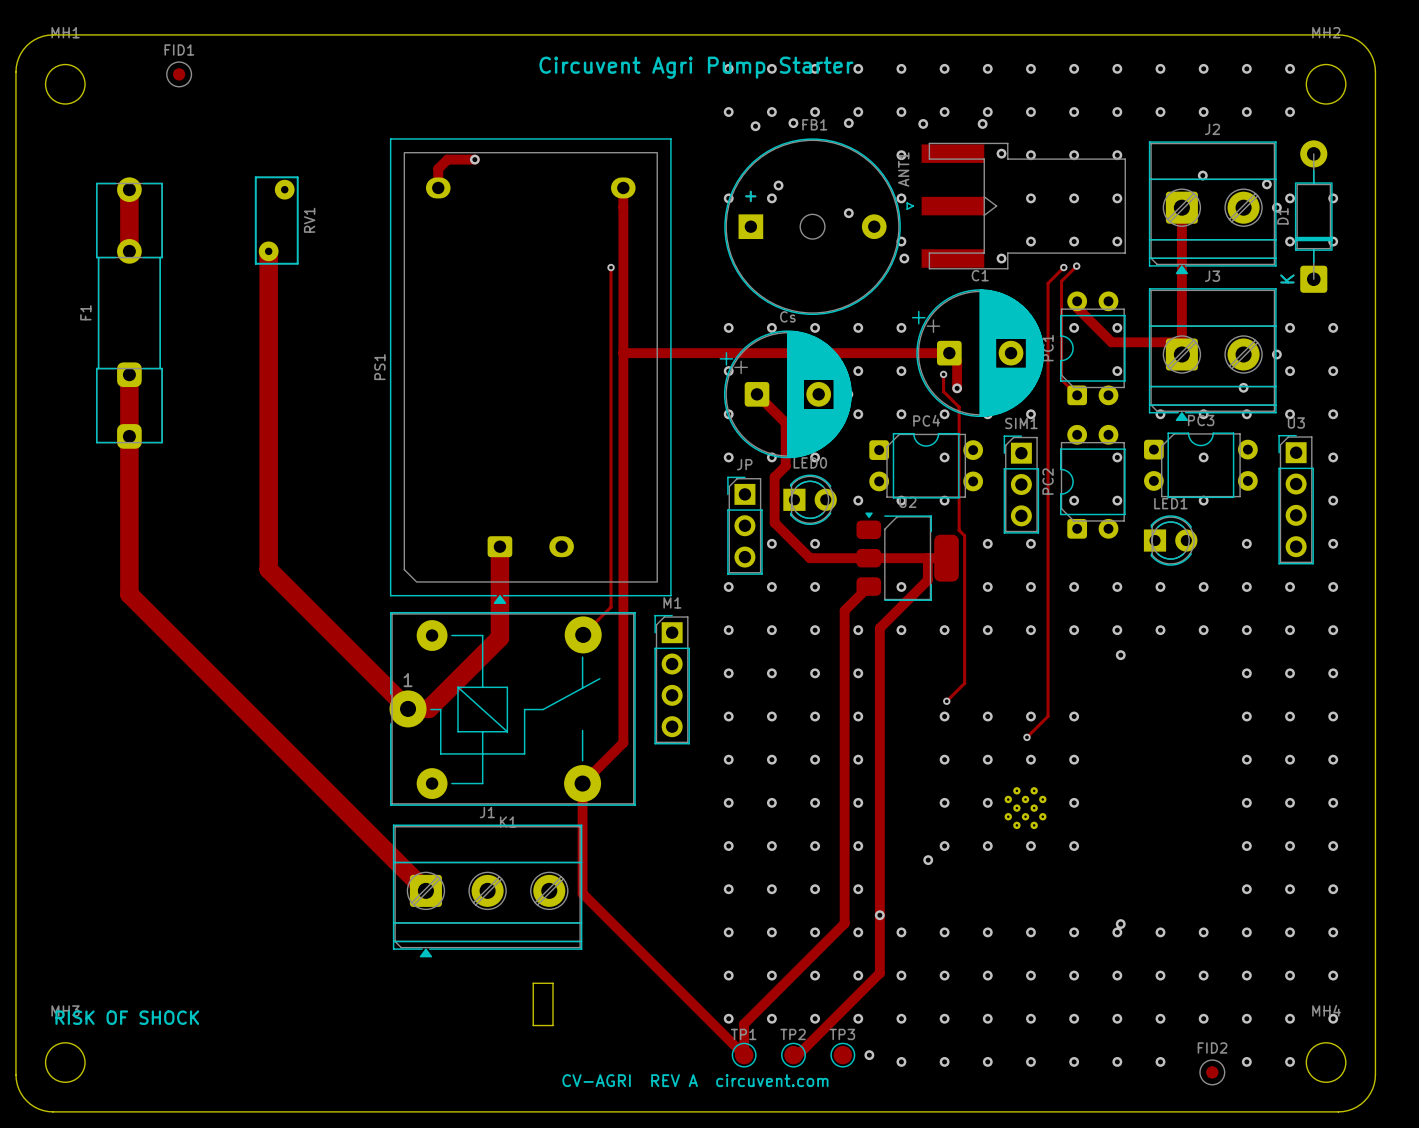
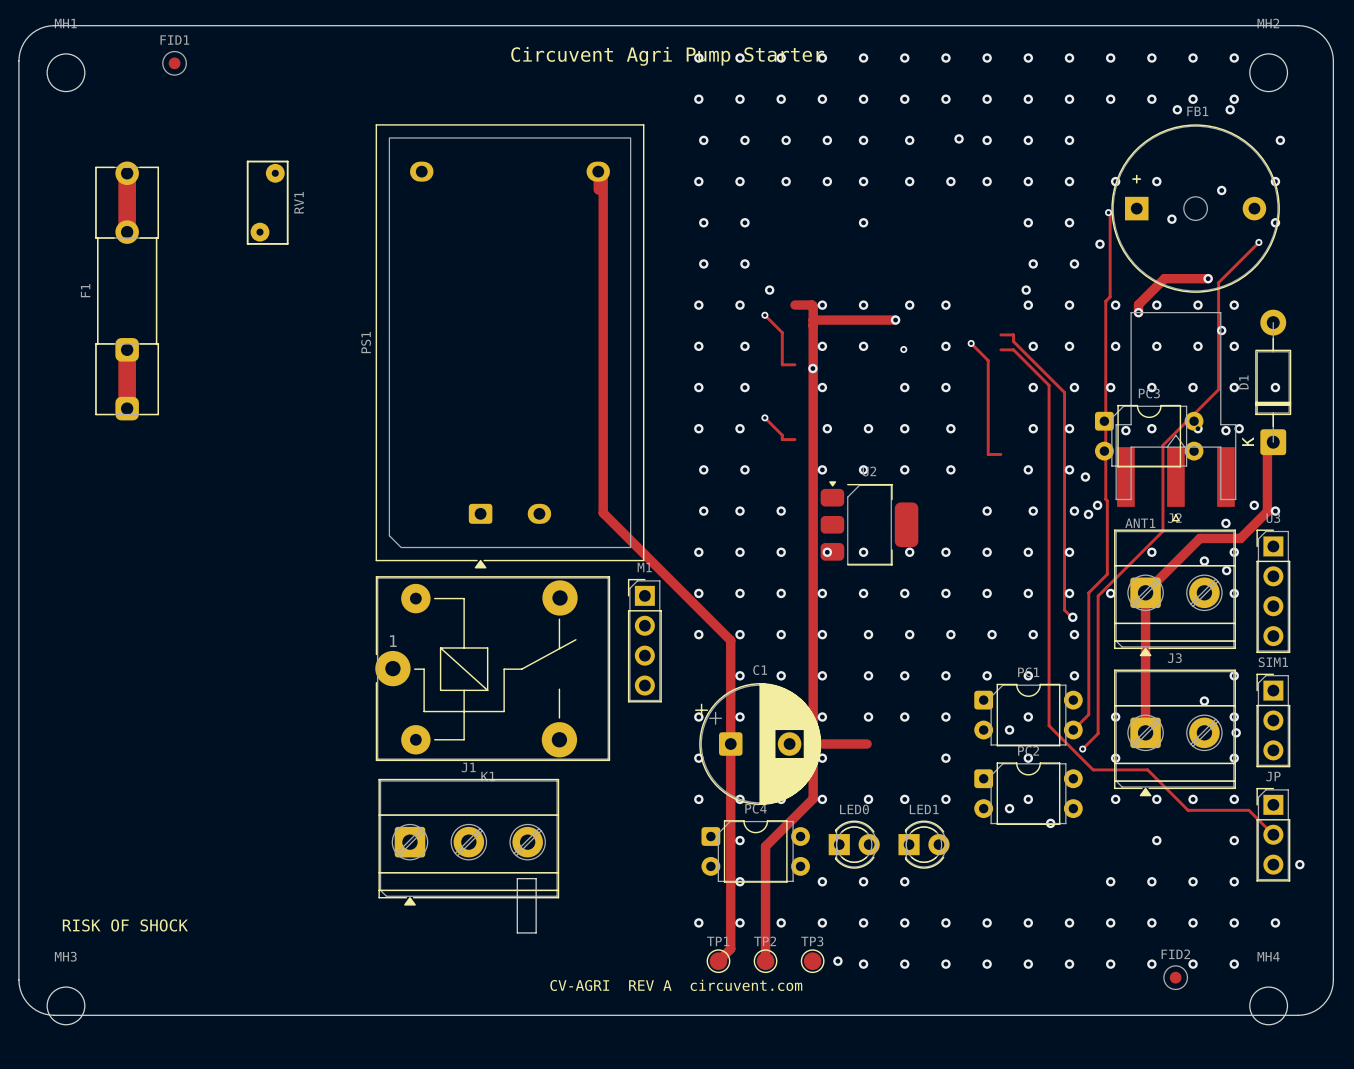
board edge: (1338, 34) (1352, 37) (1364, 45) (1372, 57) (1375, 71) (1375, 1074) (1372, 1089) (1360, 1104) (1352, 1109) (1338, 1111) (52, 1111) (34, 1106) (23, 1097) (18, 1089) (15, 1074) (15, 1035) -> (1280, 25) (1302, 25) (1315, 30) (1328, 43) (1333, 60) (1333, 980) (1330, 993) (1319, 1008) (1307, 1014) (1298, 1015) (54, 1015) (40, 1012) (29, 1004) (21, 993) (18, 980)
via: (793, 123) -> none
via: (848, 123) -> none
via: (923, 123) -> none
via: (982, 123) -> none
via: none -> (1177, 109)
via: none -> (1230, 109)
via: (755, 126) -> none
via: none -> (703, 140)
via: none -> (744, 140)
via: none -> (786, 140)
via: none -> (827, 140)
via: none -> (909, 140)
via: none -> (1280, 140)
track: (474, 159) (447, 159) (438, 168) (438, 187) -> none
via: (474, 159) -> none
via: (1202, 175) -> none
via: (1266, 184) -> none
via: (778, 185) -> none
track: none -> (603, 171) (603, 512) (730, 640) (730, 948) (718, 961)
via: none -> (786, 181)
via: none -> (827, 181)
via: none -> (909, 181)
via: none -> (950, 181)
via: none -> (1115, 181)
via: none -> (1156, 181)
via: (1290, 198) -> none
ANT1 rotation: 0° (1016, 206) -> 90° counterclockwise (1175, 416)
ANT1 position: (1016, 206) -> (1175, 416)
track: (623, 207) (623, 742) (582, 783) (582, 893) (744, 1055) (744, 1024) (844, 923) (844, 610) (868, 586) -> none
track: (1181, 207) (1181, 354) -> none
J2 position: (1212, 207) -> (1175, 592)
via: (848, 213) -> none
D1 position: (1313, 216) -> (1273, 382)
FB1 position: (812, 226) -> (1195, 208)
track: none -> (1108, 212) (1110, 214) (1110, 296) (1105, 301) (1107, 574) (1088, 592) (1088, 714) (1073, 730)
via: none -> (1108, 212)
via: none -> (1171, 219)
via: none -> (703, 222)
via: none -> (744, 222)
via: (1030, 241) -> none
via: (1290, 241) -> none
track: (268, 251) (268, 569) (408, 708) (428, 708) (499, 637) (499, 546) -> none
via: (904, 258) -> none
via: (1001, 258) -> none
track: none -> (1258, 242) (1218, 282) (1218, 389) (1162, 445) (1162, 531) (1098, 596) (1098, 733) (1082, 749)
via: none -> (1258, 242)
via: none -> (1099, 244)
track: (1076, 266) (1061, 281) (1061, 379) (1077, 395) -> none
via: (1076, 266) -> none
track: (611, 267) (611, 607) (583, 634) -> none
via: (611, 267) -> none
track: (1063, 267) (1048, 283) (1048, 716) (1026, 737) -> none
via: (1063, 267) -> none
via: none -> (703, 263)
via: none -> (744, 263)
via: none -> (1033, 263)
via: none -> (1074, 263)
track: none -> (1208, 278) (1164, 278) (1138, 304) (1138, 312)
via: none -> (1208, 278)
track: (1077, 301) (1077, 307) (1111, 342) (1181, 342) -> none
via: none -> (1026, 290)
via position: (815, 327) -> (769, 290)
track: none -> (794, 305) (813, 306) (813, 798) (765, 846) (765, 961)
via: none -> (909, 305)
via: none -> (1115, 305)
via: none -> (1156, 305)
via: none -> (1198, 305)
via: (1333, 327) -> none
via: none -> (1138, 312)
track: none -> (764, 315) (782, 332) (782, 364) (794, 364)
via: none -> (764, 315)
track: none -> (813, 320) (895, 320)
via: none -> (895, 320)
PC1 rotation: 0° (1092, 348) -> 90° clockwise (1028, 715)
PC1 position: (1092, 348) -> (1028, 715)
track: (623, 353) (949, 353) (957, 360) (957, 388) -> none
C1 position: (977, 353) -> (758, 744)
J3 position: (1212, 354) -> (1175, 732)
track: none -> (1000, 334) (1013, 334) (1013, 341) (1064, 392) (1064, 610) (1072, 617)
track: none -> (971, 343) (988, 360) (988, 454) (1000, 454)
via: none -> (971, 343)
via: none -> (744, 346)
via: none -> (1033, 346)
via: none -> (1115, 346)
via: none -> (1156, 346)
via: (1333, 371) -> none
track: (943, 374) (943, 391) (959, 407) (959, 530) (964, 535) (964, 683) (946, 701) -> none
track: none -> (1000, 349) (1013, 349) (1049, 385) (1049, 725) (1093, 769) (1147, 769) (1188, 810) (1248, 810) (1273, 834)
via position: (1243, 387) -> (1198, 346)
via: (957, 388) -> none
track: (757, 394) (785, 423) (785, 466) (774, 477) (774, 522) (810, 558) (946, 558) -> none
Cs: (785, 394) -> none
via: none -> (744, 387)
via: (901, 414) -> none
via: (1030, 414) -> none
via: none -> (1033, 387)
via: none -> (1074, 387)
track: (129, 436) (129, 594) (425, 890) -> none
track: none -> (764, 417) (782, 435) (782, 439) (794, 439)
via: none -> (764, 417)
via: (815, 457) -> none
via: none -> (827, 428)
via: none -> (868, 428)
via: none -> (950, 428)
via: none -> (1033, 428)
via: none -> (1198, 428)
via: none -> (1239, 428)
via: (1333, 457) -> none
via: none -> (1125, 430)
via: none -> (1225, 430)
PC4 position: (926, 465) -> (755, 851)
track: none -> (1273, 442) (1267, 448) (1267, 511) (1240, 538) (1199, 538) (1145, 592) (1145, 732)
PC2 rotation: 0° (1092, 481) -> 90° clockwise (1028, 793)
PC2 position: (1092, 481) -> (1028, 793)
SIM1 position: (1021, 484) -> (1273, 720)
LED0 position: (810, 499) -> (854, 844)
U3 position: (1296, 499) -> (1273, 591)
via: none -> (703, 469)
via: none -> (744, 469)
via: none -> (950, 469)
via: (1203, 500) -> none
via: (1333, 500) -> none
via: none -> (1085, 477)
JP: (744, 525) -> none
via: none -> (1097, 505)
via: none -> (1254, 505)
LED1 position: (1170, 540) -> (923, 844)
via: none -> (703, 511)
via: (987, 543) -> none
via: none -> (1033, 511)
via: none -> (1074, 511)
via: (1246, 543) -> none
via: none -> (1088, 514)
via: none -> (1225, 523)
track: (927, 558) (927, 580) (879, 628) (879, 973) (797, 1055) (793, 1055) -> none
via: none -> (827, 552)
via: none -> (909, 552)
via: (1160, 586) -> none
via position: (1246, 586) -> (1204, 561)
via: (1333, 586) -> none
via: none -> (1226, 570)
via: (1203, 630) -> none
via: (1246, 630) -> none
via: (1333, 630) -> none
via: none -> (868, 634)
via: none -> (909, 634)
via: none -> (950, 634)
via: none -> (992, 634)
via: none -> (1033, 634)
via: none -> (1074, 634)
via: (1246, 673) -> none
via: (1290, 673) -> none
via: (1333, 673) -> none
via: (946, 701) -> none
via: (728, 716) -> none
via: none -> (868, 675)
via: none -> (1074, 675)
via: (1246, 716) -> none
via: (1333, 716) -> none
via: (1026, 737) -> none
via: none -> (1204, 701)
via: none -> (868, 717)
via position: (1030, 759) -> (1009, 730)
via: none -> (1115, 717)
via: (1246, 759) -> none
via: (1333, 759) -> none
via: none -> (1236, 732)
track: none -> (813, 744) (867, 744)
via: none -> (1082, 749)
via: (771, 802) -> none
via: (815, 802) -> none
via: (944, 802) -> none
via: none -> (1115, 758)
via: (1246, 802) -> none
via: (1333, 802) -> none
part: (1025, 808) -> none
via position: (1030, 846) -> (1009, 808)
via: none -> (1115, 799)
via: none -> (1156, 799)
via: (1333, 846) -> none
via position: (928, 860) -> (868, 799)
via: none -> (1050, 823)
JP: none -> (1273, 834)
via: (728, 889) -> none
via: (815, 889) -> none
via: (858, 889) -> none
via: none -> (1156, 840)
via: (1246, 889) -> none
via: (1333, 889) -> none
via: none -> (1299, 864)
via: (879, 915) -> none
via: (1120, 924) -> none
board edge: none -> (517, 878) (536, 878) (536, 932) (517, 932) (517, 878)
via: (728, 932) -> none
via: (815, 932) -> none
via: (987, 932) -> none
via: (1030, 932) -> none
via: (1074, 932) -> none
via: (1117, 932) -> none
via: (1333, 932) -> none
board edge: (533, 983) (552, 983) (552, 1025) (533, 1025) (533, 983) -> none
text position: RISK OF SHOCK (127, 1017) -> RISK OF SHOCK (125, 925)
via: (728, 1018) -> none
via: (771, 1018) -> none
via: (815, 1018) -> none
via position: (858, 1018) -> (837, 961)
via: (1333, 1018) -> none
TP1 position: (744, 1055) -> (718, 961)
TP2 position: (793, 1055) -> (765, 961)
TP3 position: (842, 1055) -> (812, 961)
via: (869, 1055) -> none
via: (901, 1061) -> none
via: (944, 1061) -> none
via: (987, 1061) -> none
via: (1030, 1061) -> none
via: (1074, 1061) -> none
via: (1117, 1061) -> none
via: (1160, 1061) -> none
via: (1246, 1061) -> none
via: (1290, 1061) -> none
FID2 position: (1212, 1072) -> (1175, 977)
text position: CV-AGRI REV A circuvent.com (695, 1080) -> CV-AGRI REV A circuvent.com (676, 985)

